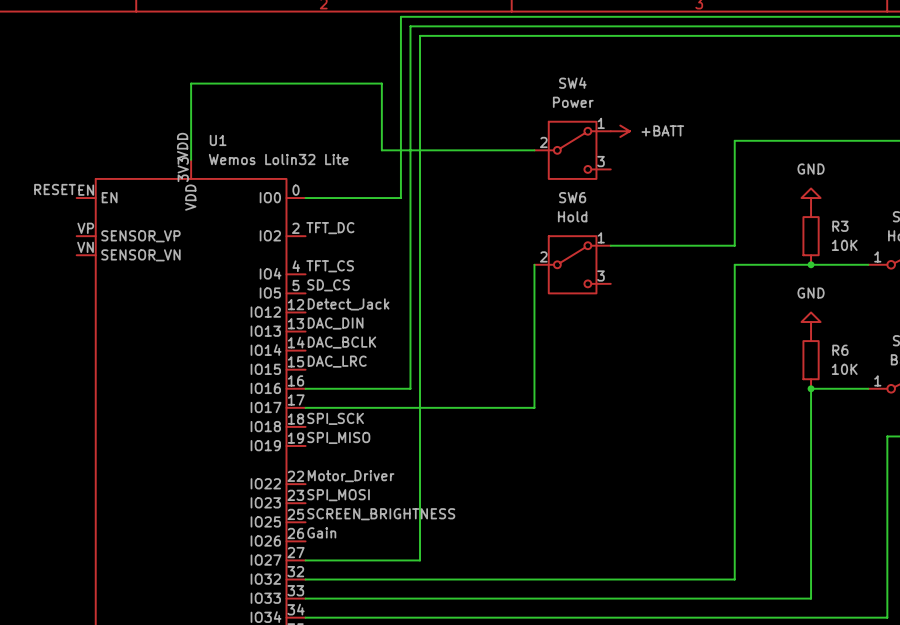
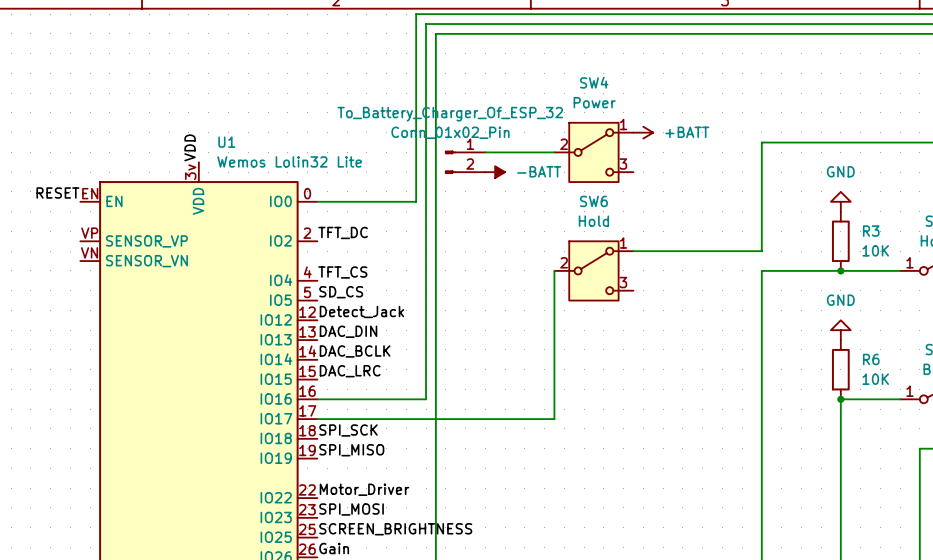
wire: (467, 150) (381, 150) (381, 83) (191, 83) (191, 159) -> none
To_Battery_Charger_Of_ESP_32: none -> Conn_01x02_Pin (465, 162)
U1 pin number: 3V3 (183, 169) -> 3v (190, 172)
power symbol: none -> -BATT (495, 172)

